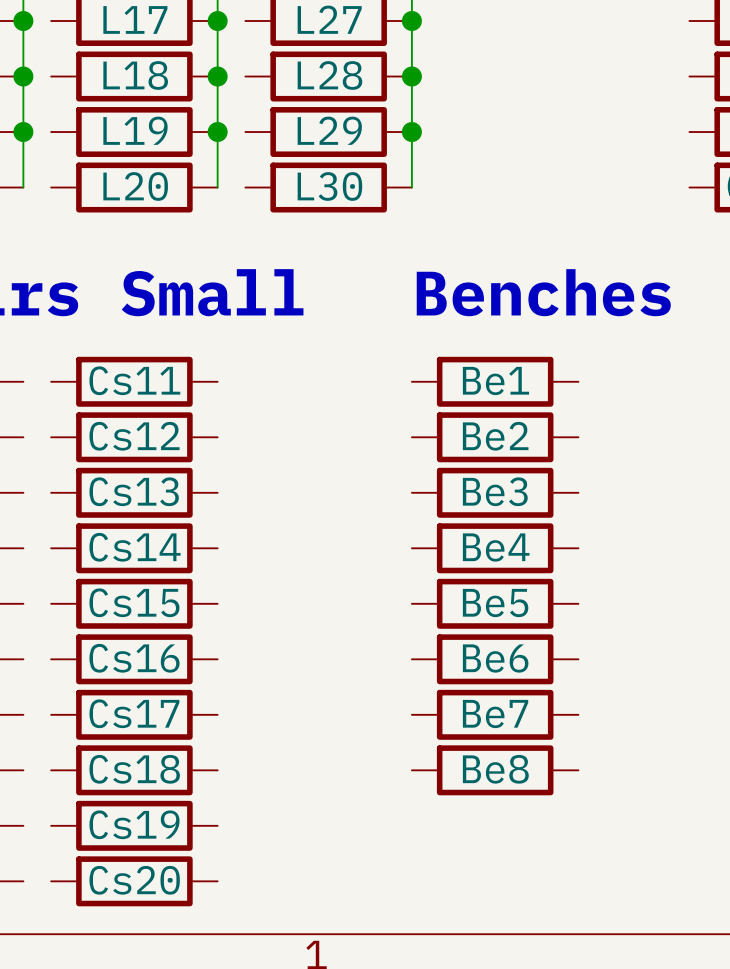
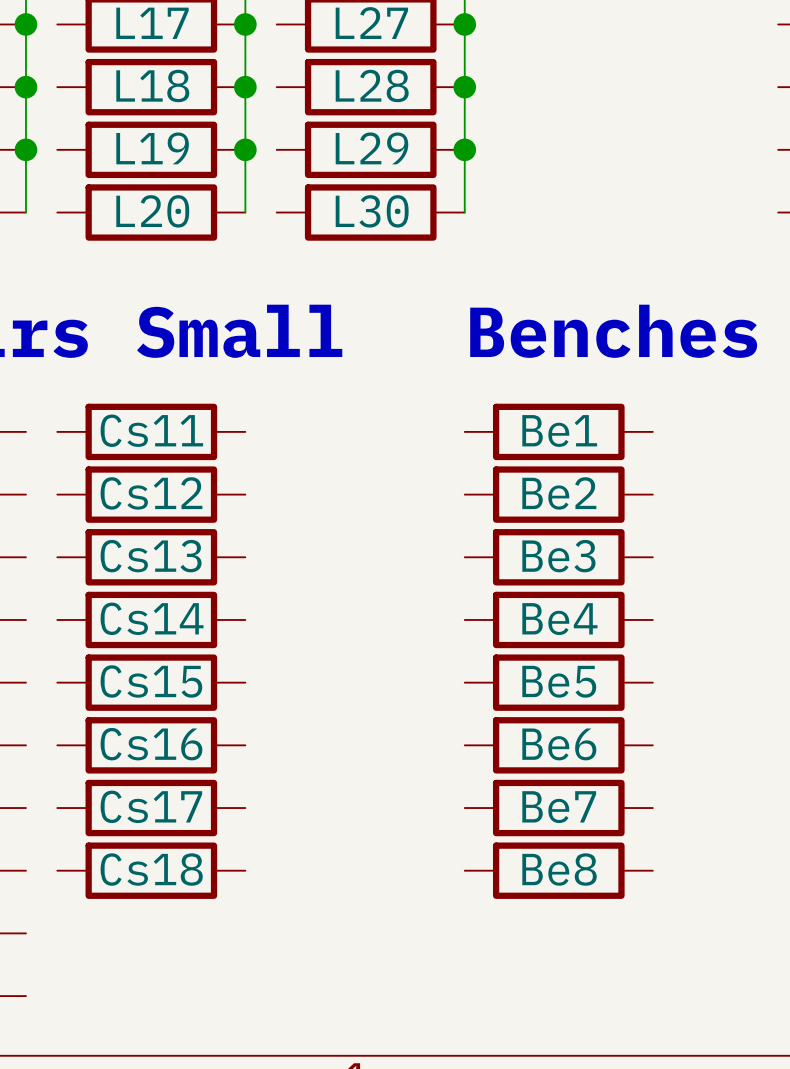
Cs19: (134, 825) -> none
Cs20: (134, 881) -> none

